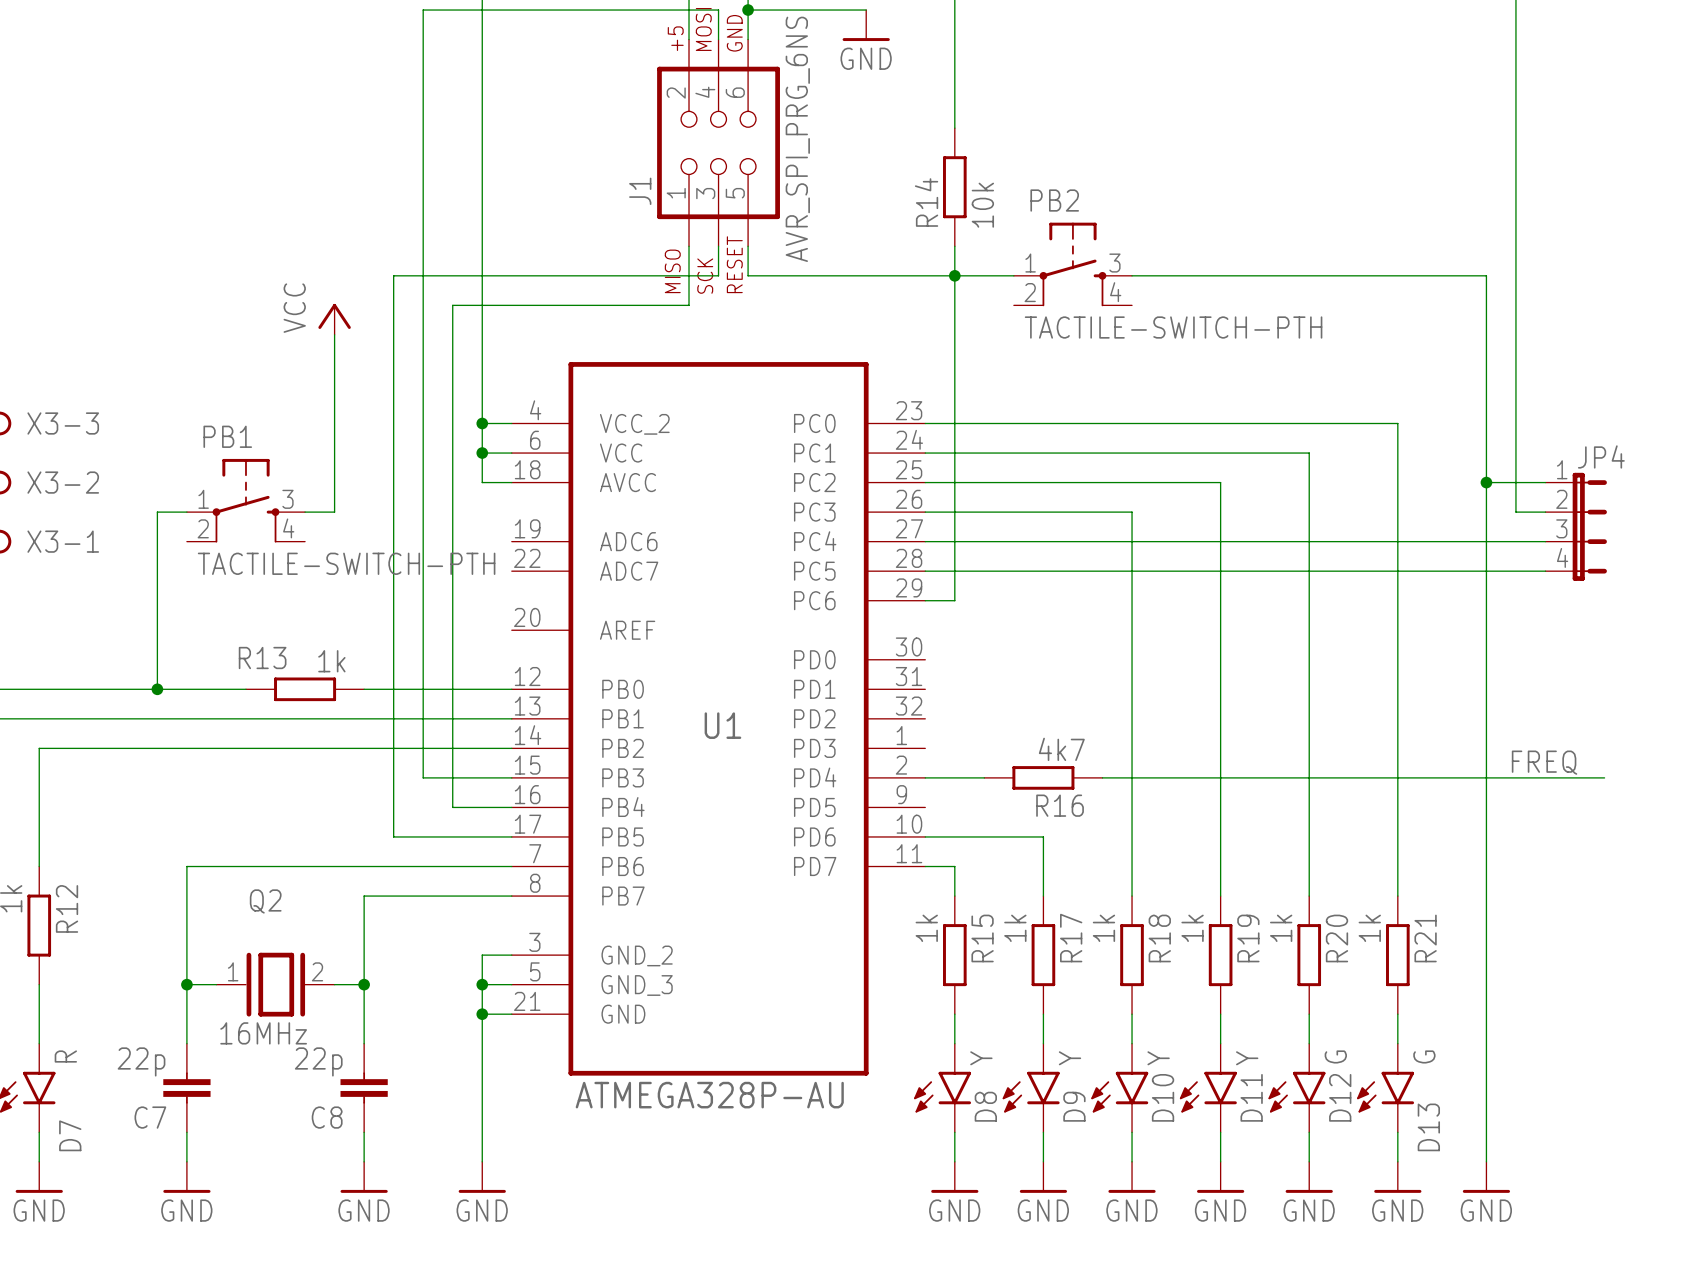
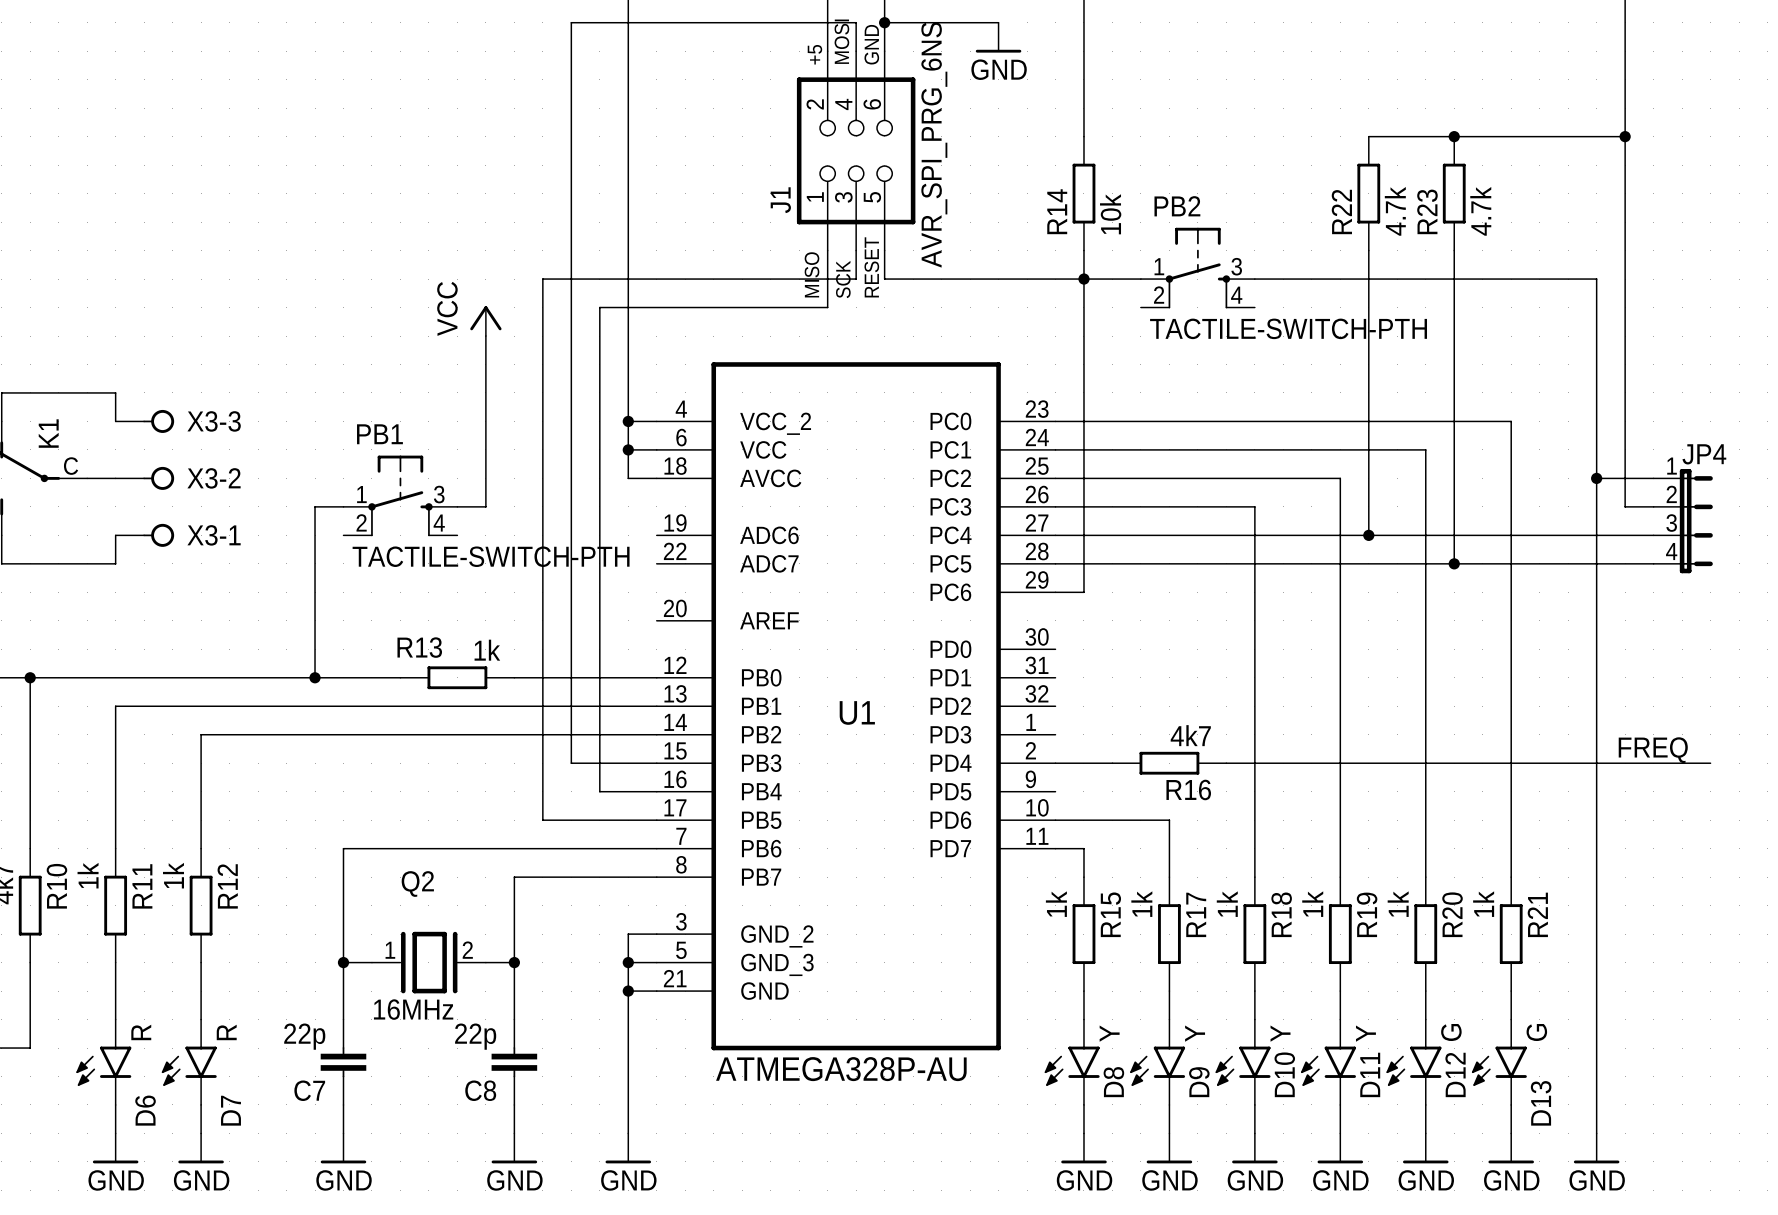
wire: none -> (1368, 136) (1625, 136)
junction: none -> (1454, 136)
junction: none -> (1625, 136)
R22: none -> 4.7k (1368, 193)
R23: none -> 4.7k (1454, 193)
wire: none -> (1368, 250) (1368, 535)
wire: none -> (1454, 250) (1454, 563)
junction: none -> (1368, 535)
junction: none -> (1454, 563)

